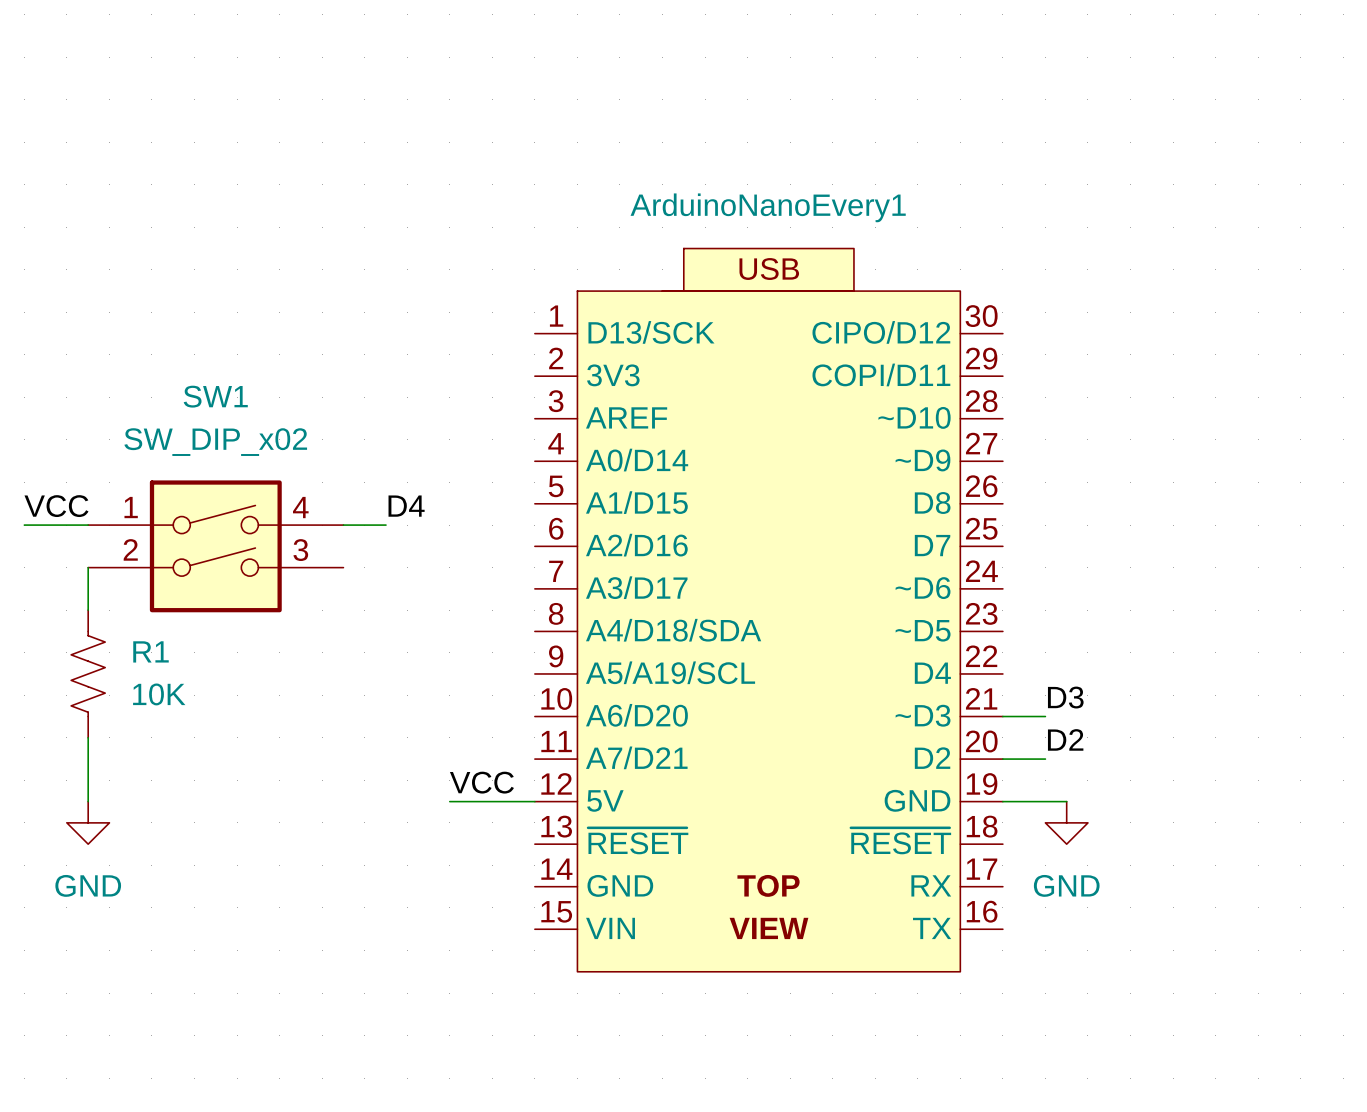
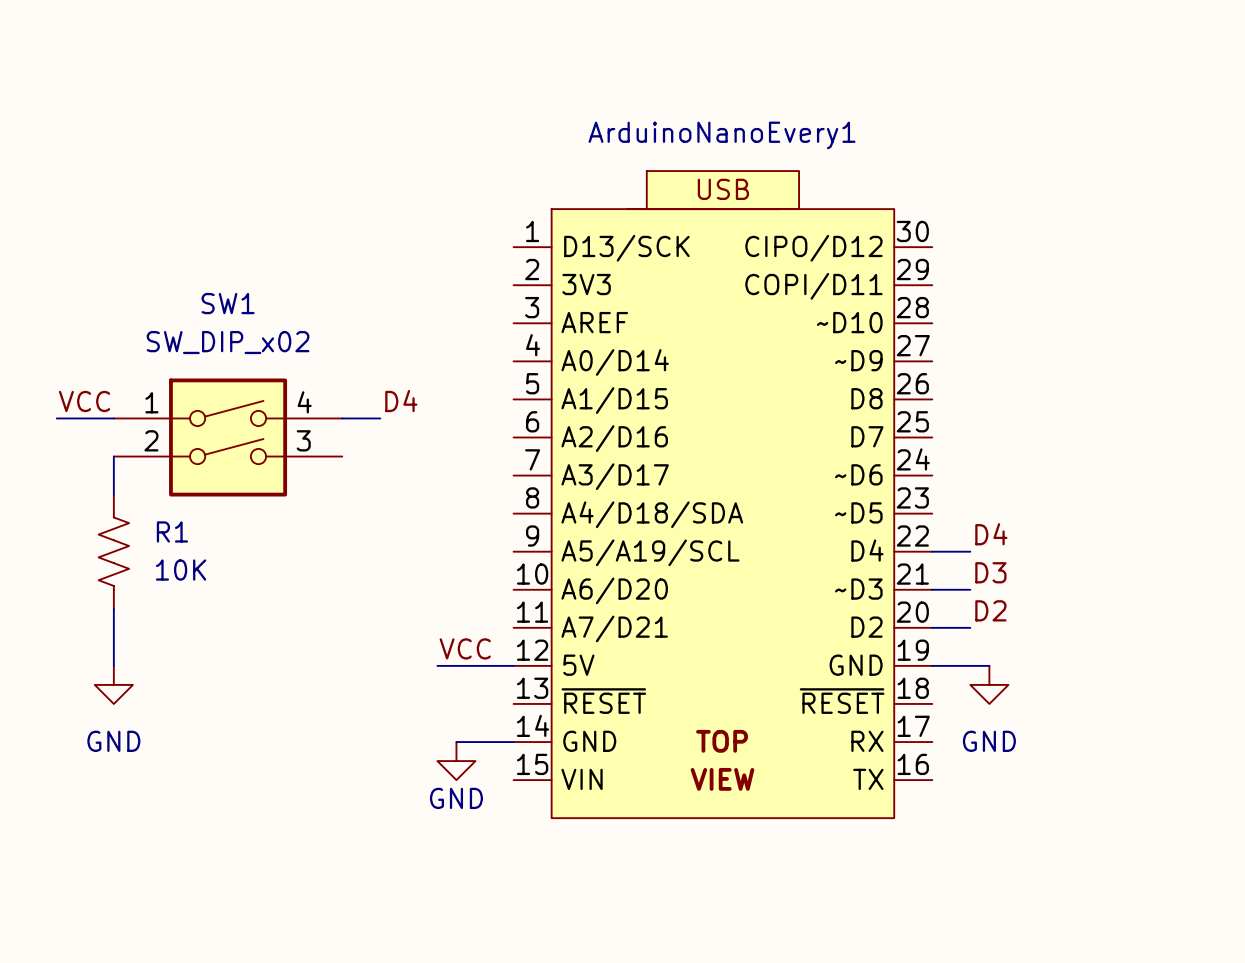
label: none -> D4 (991, 534)
wire: none -> (932, 551) (970, 551)
wire: none -> (456, 742) (513, 742)
power symbol: none -> GND (456, 761)

